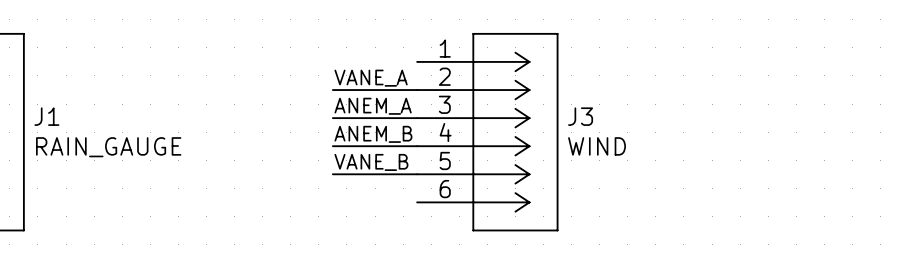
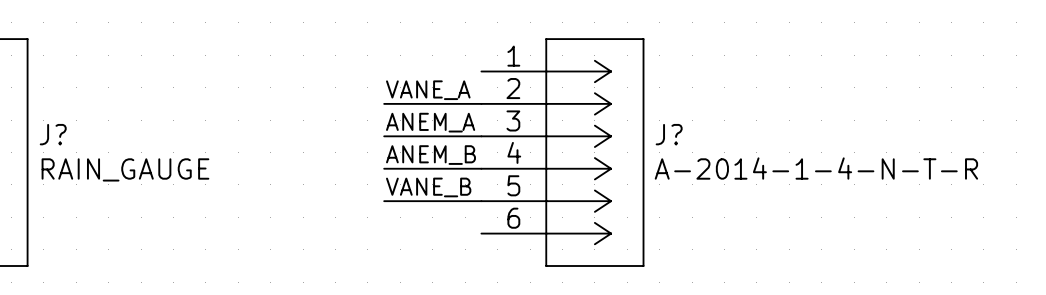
J1 name: J1 (46, 116) -> J? (53, 134)
J3 name: J3 (580, 116) -> J? (669, 134)
J3 value: WIND (597, 146) -> A-2014-1-4-N-T-R (816, 168)

